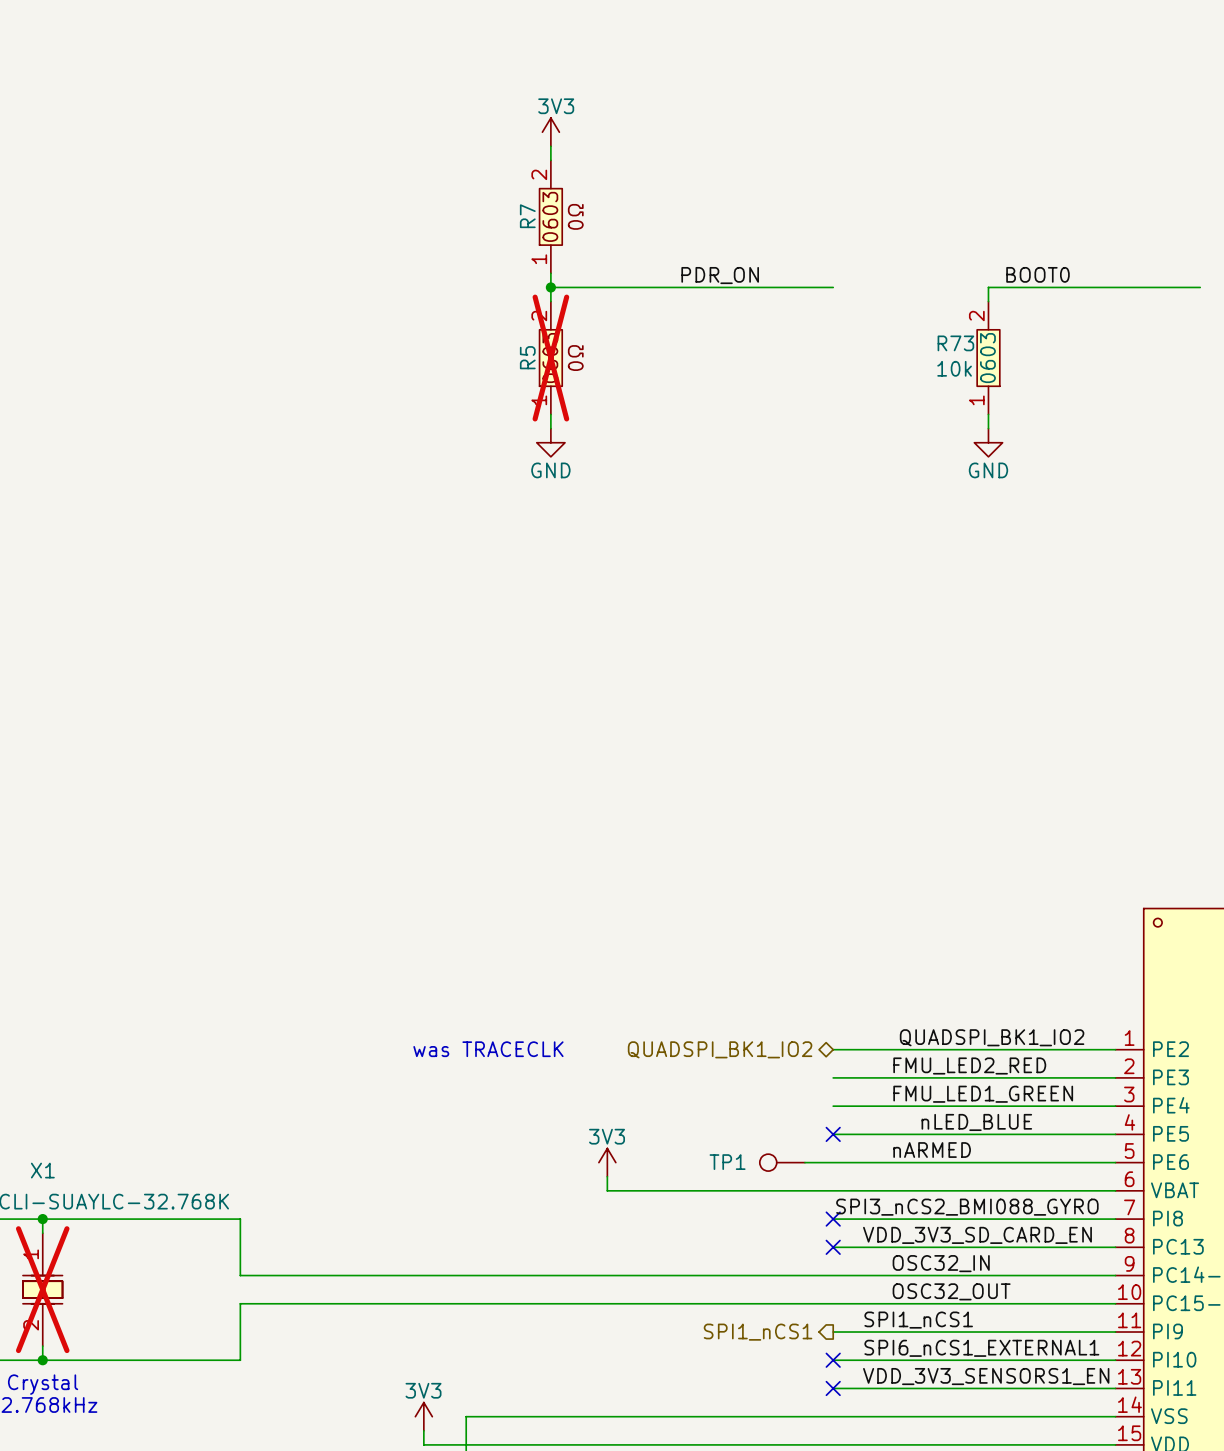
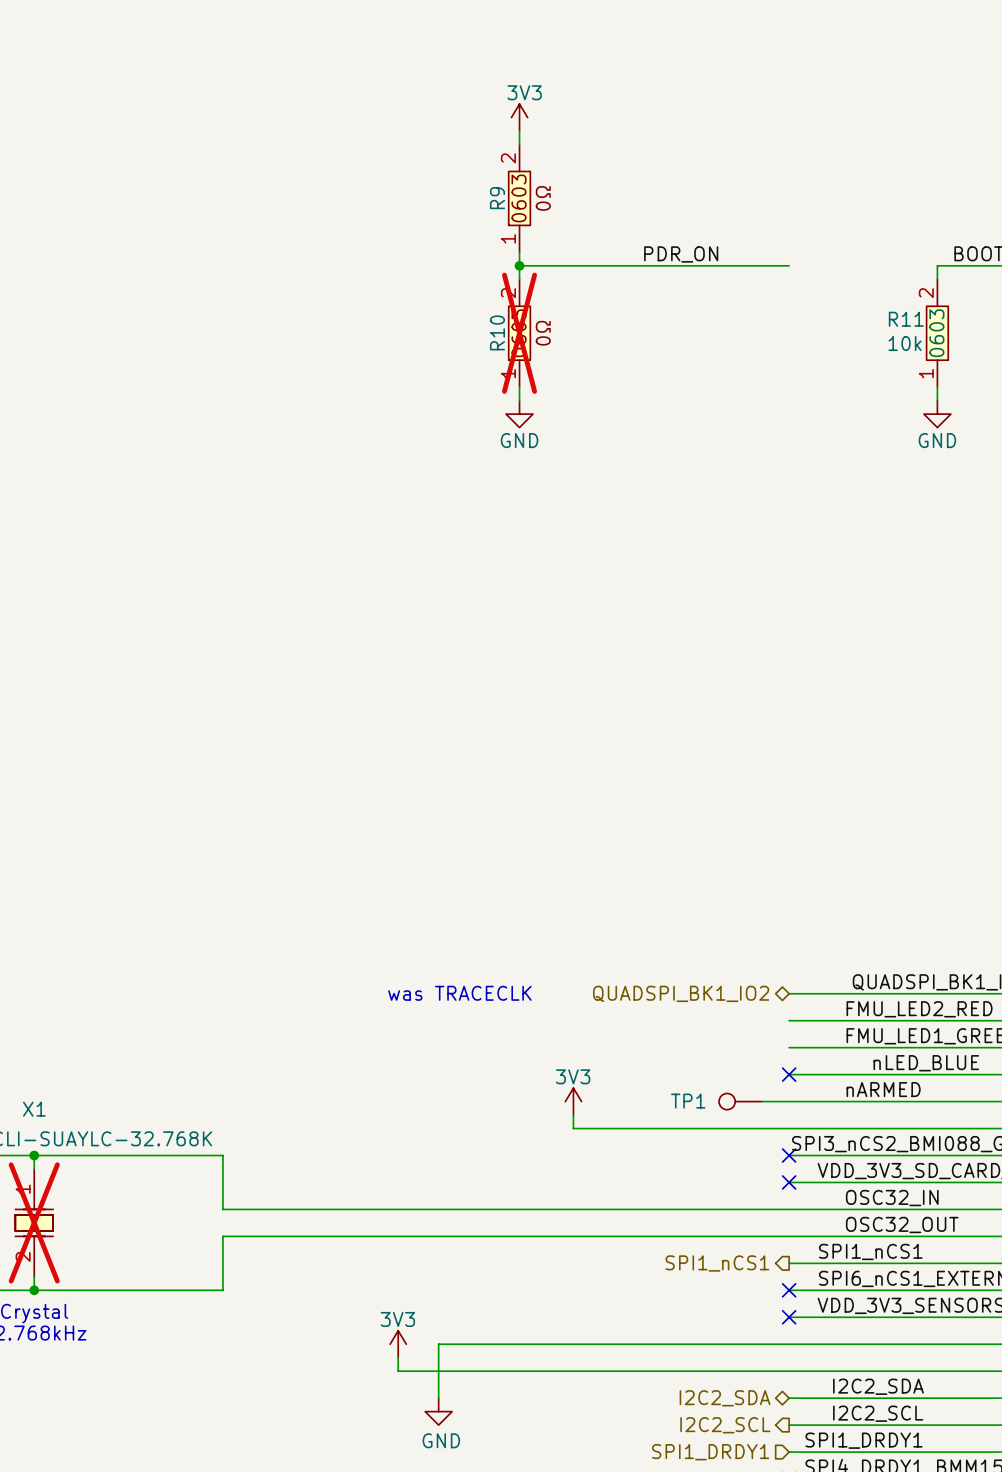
R7 name: R7 (527, 216) -> R9 (497, 198)
R73 name: R73 (955, 343) -> R11 (906, 319)
R5 name: R5 (527, 357) -> R10 (497, 332)

